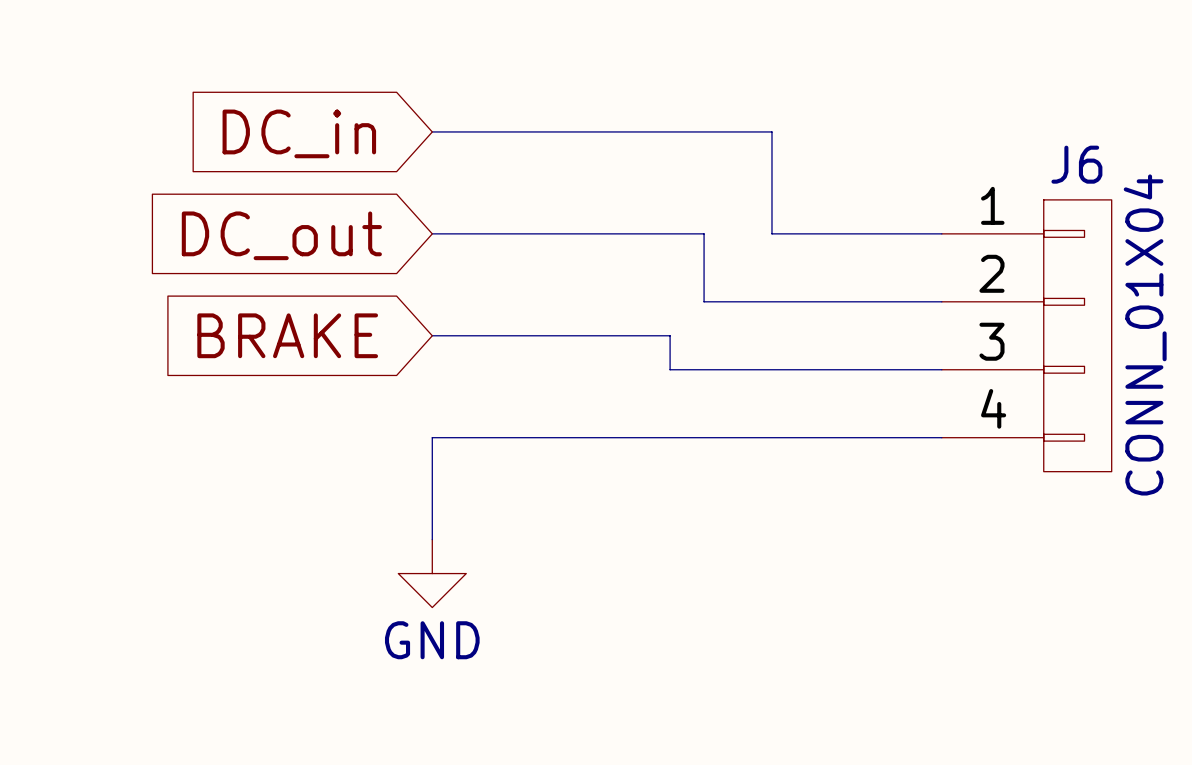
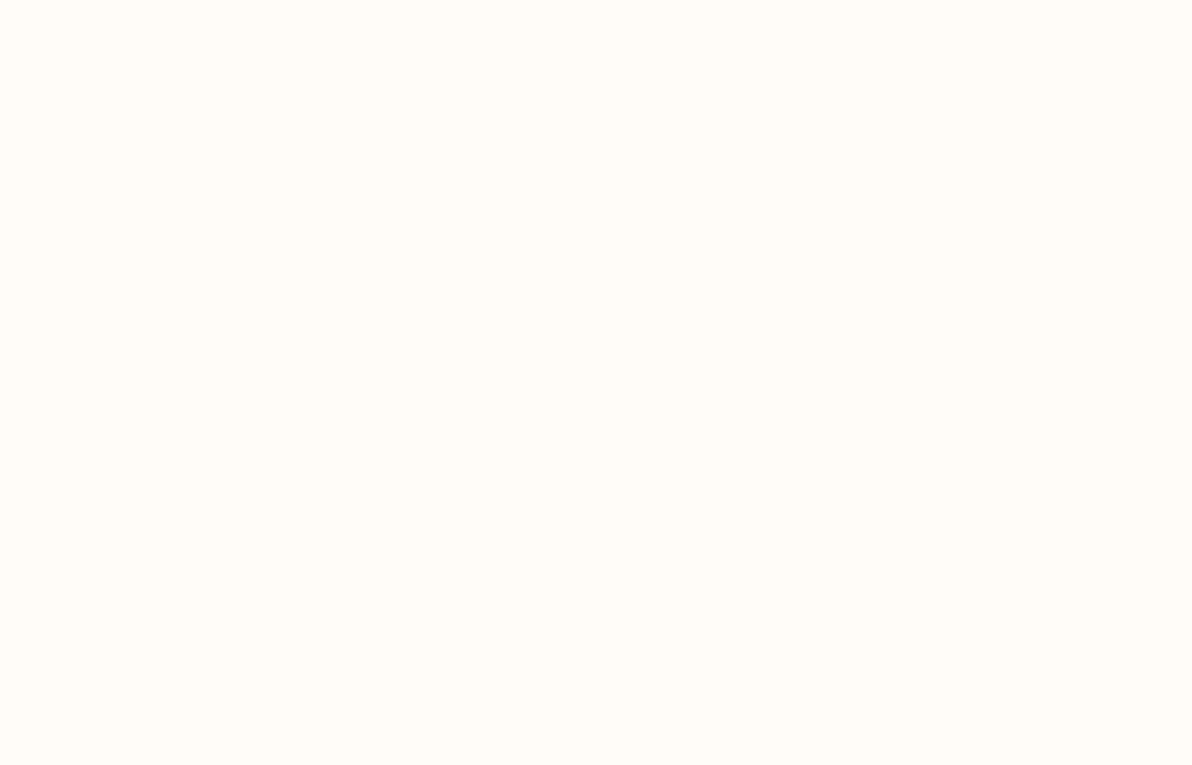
wire: (432, 131) (771, 131) (771, 233) (941, 233) -> none
global label: DC_in (299, 133) -> none
wire: (432, 233) (704, 233) (704, 301) (941, 301) -> none
global label: DC_out (281, 235) -> none
global label: BRAKE (287, 335) -> none
wire: (432, 335) (670, 335) (670, 369) (941, 369) -> none
J6: CONN_01X04 (1026, 335) -> none
wire: (941, 437) (432, 437) (432, 539) -> none
power symbol: GND (432, 573) -> none

